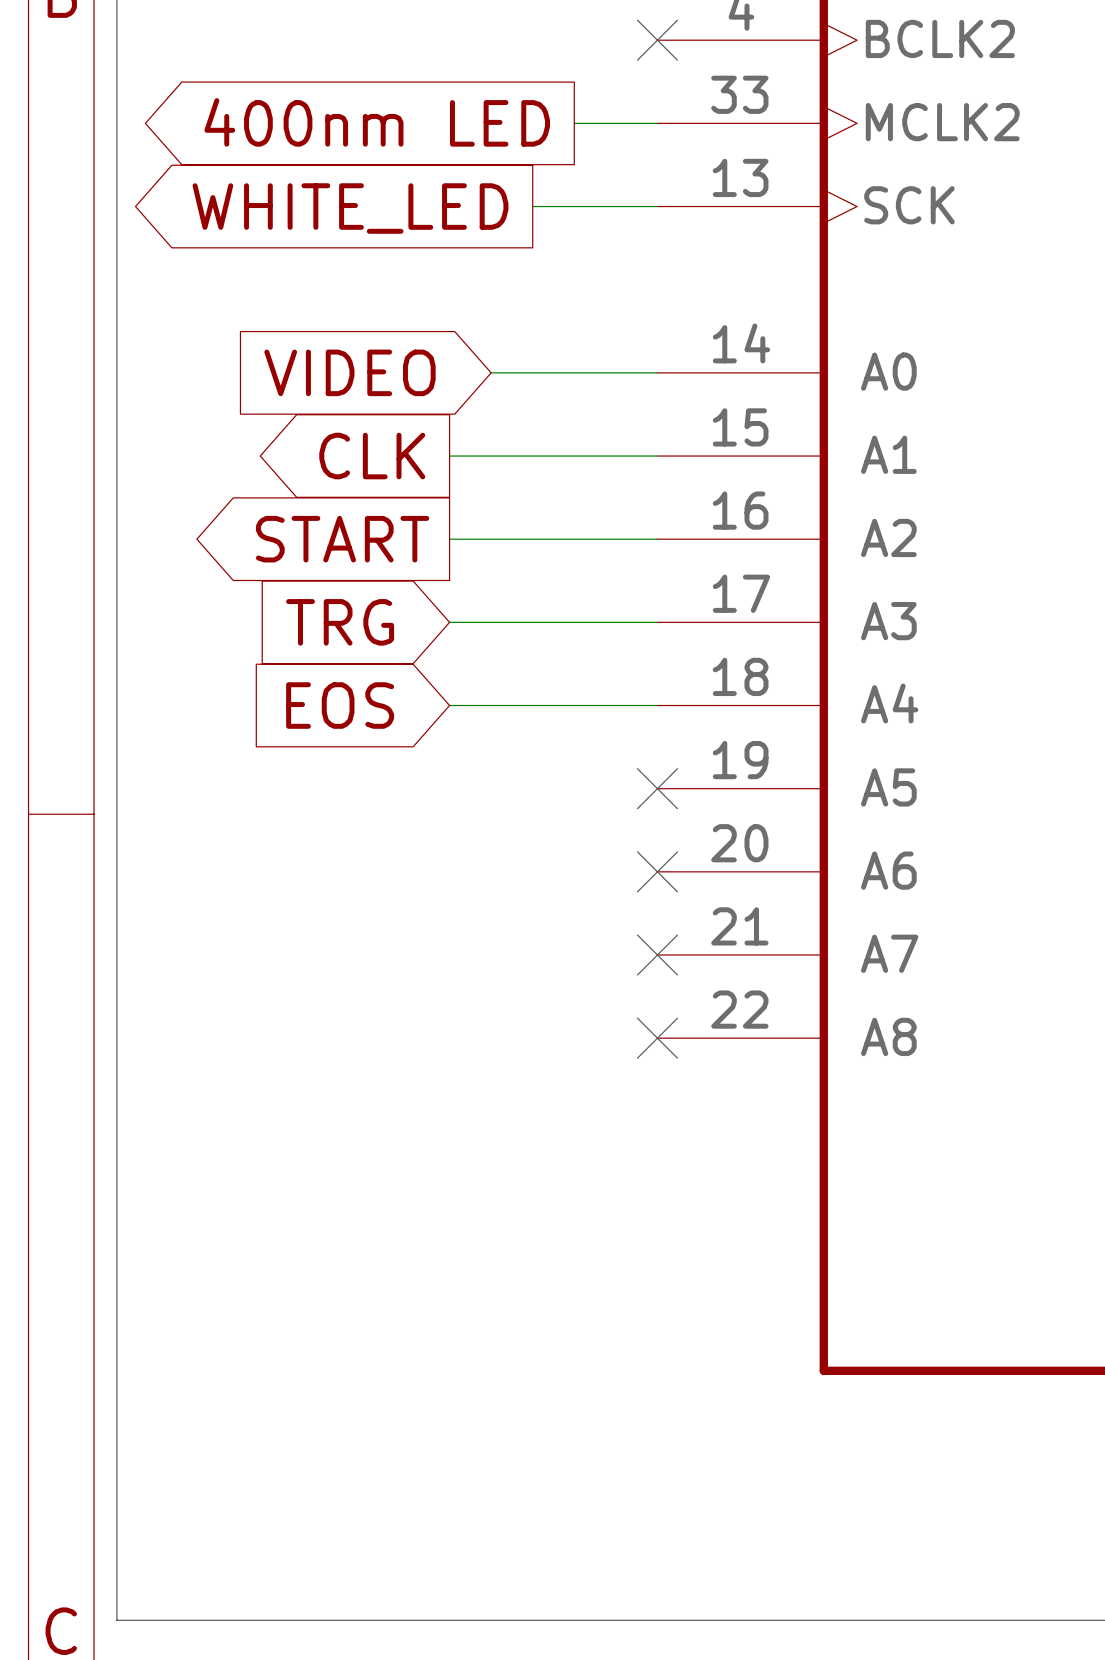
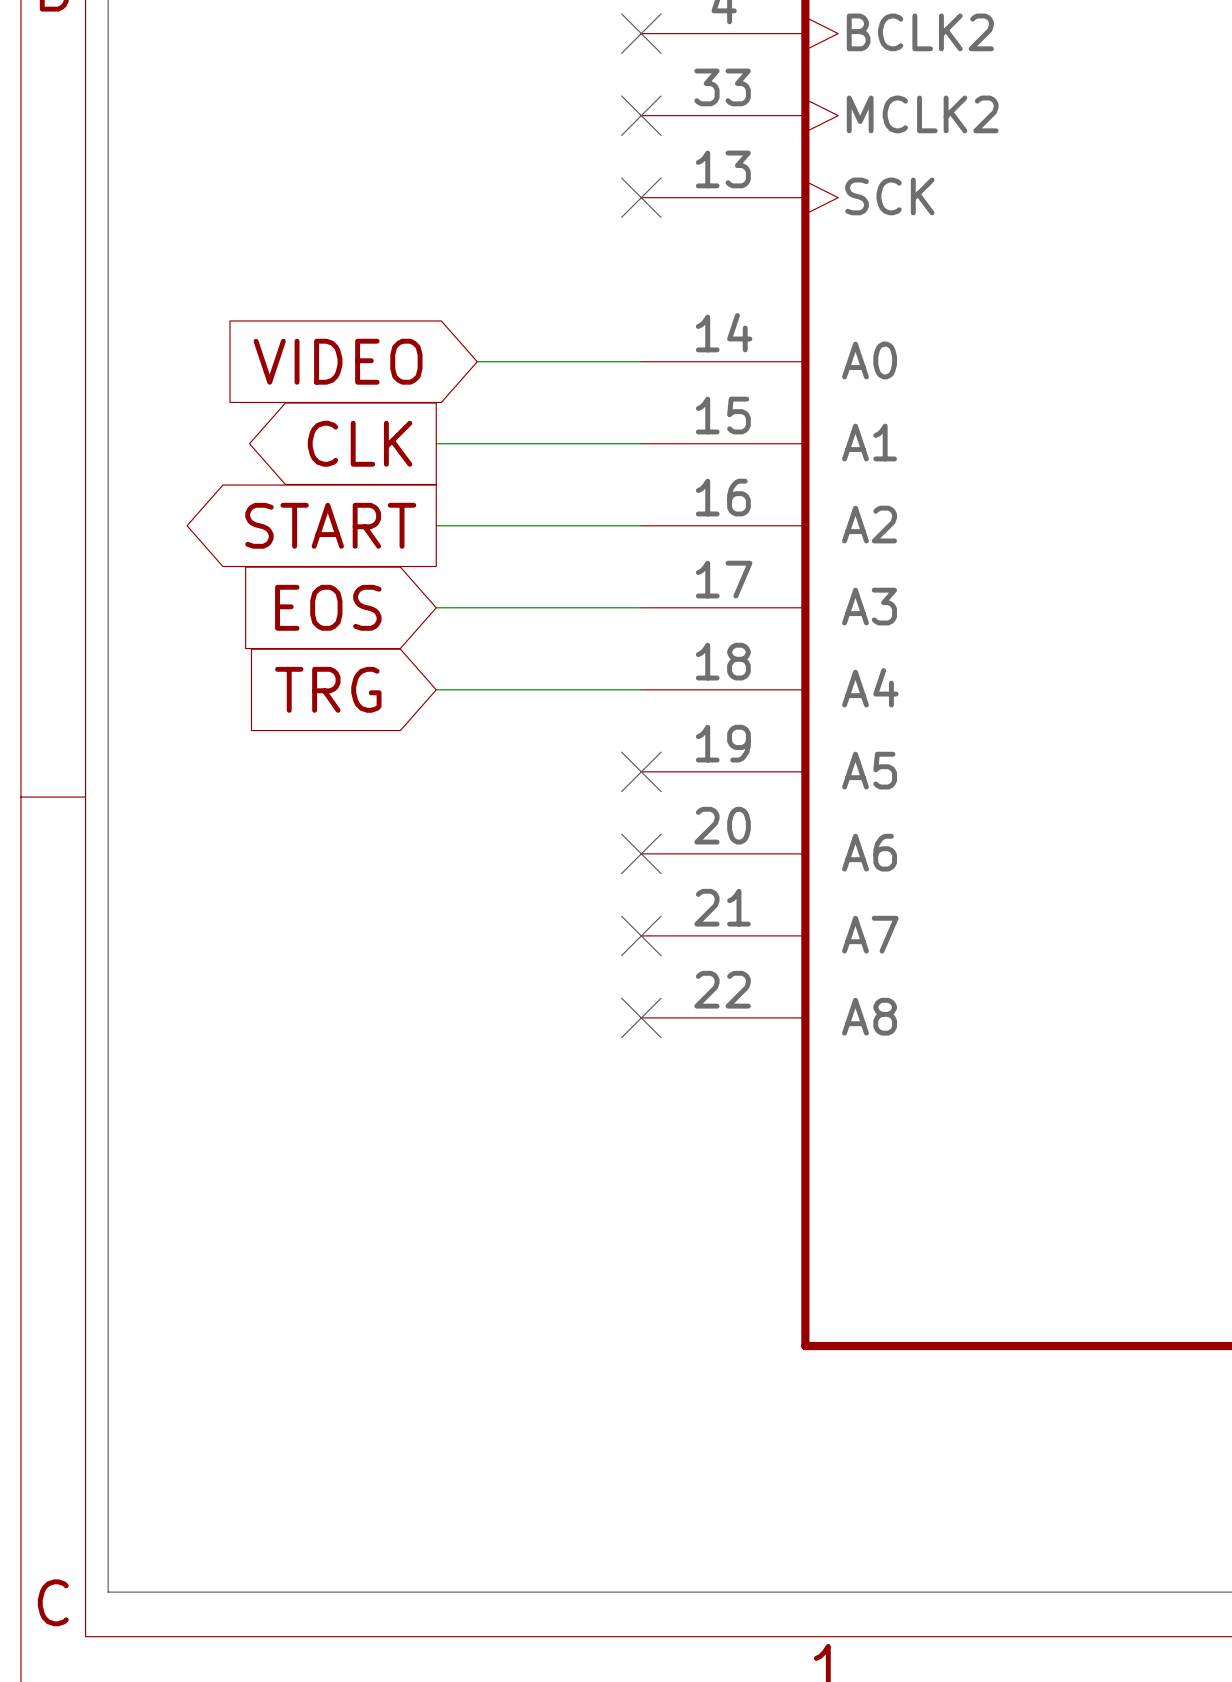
global label: 400nm LED (377, 122) -> none
wire: (574, 123) (657, 123) -> none
no-connect mark: none -> (641, 115)
wire: (532, 206) (657, 206) -> none
no-connect mark: none -> (641, 197)
global label: WHITE_LED (350, 208) -> none
global label: TRG (340, 622) -> EOS (328, 607)
global label: EOS (340, 705) -> TRG (328, 689)

